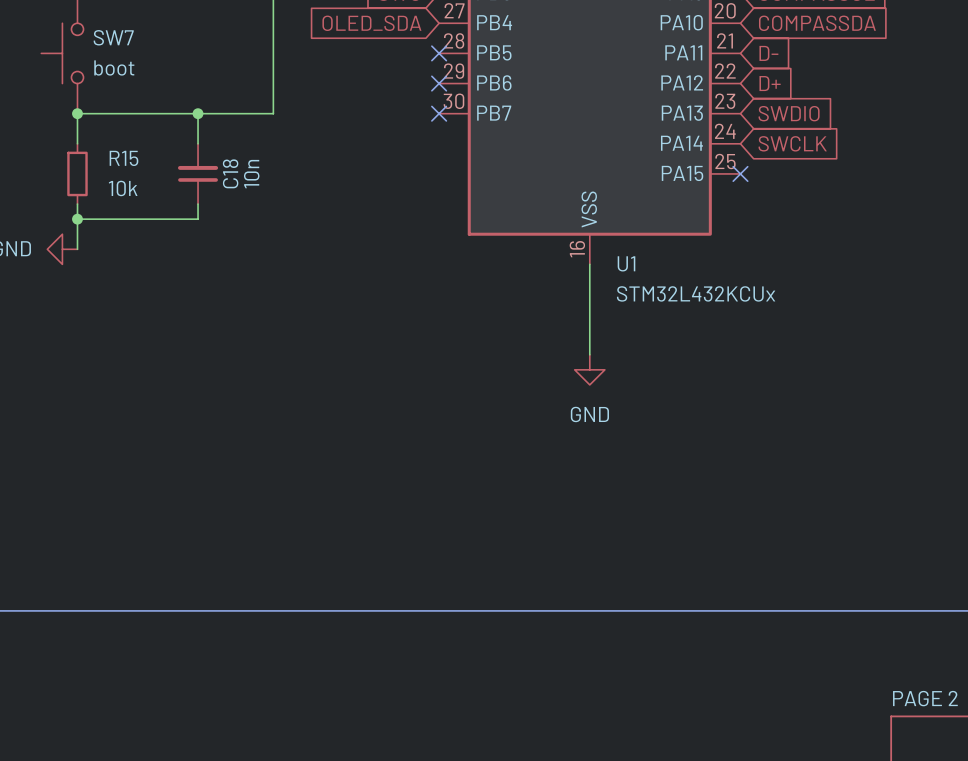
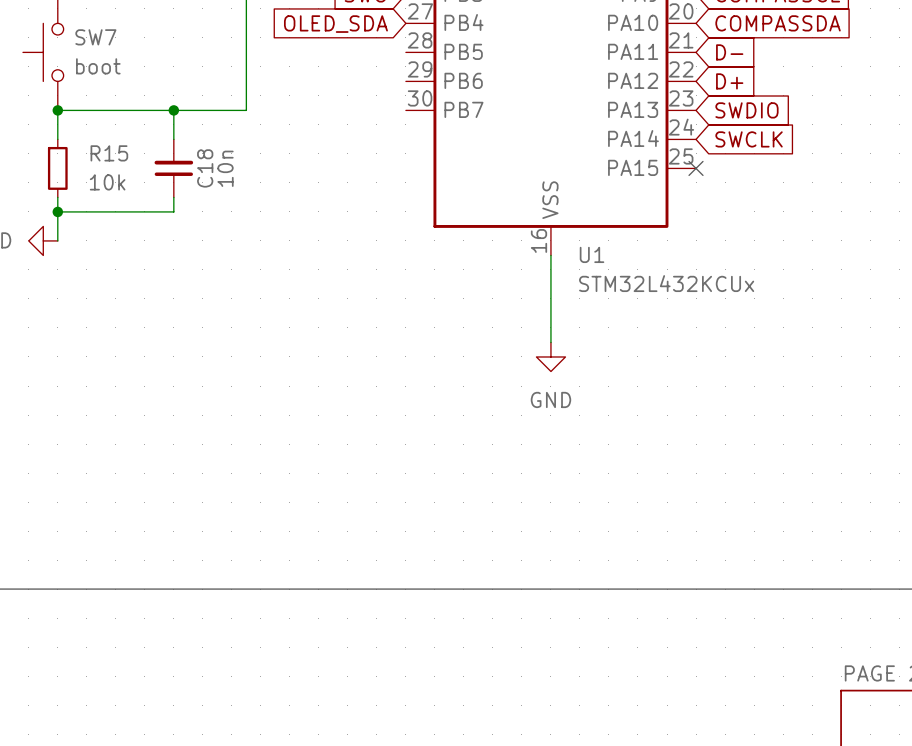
no-connect mark: (439, 53) -> none
no-connect mark: (439, 83) -> none
no-connect mark: (439, 113) -> none

